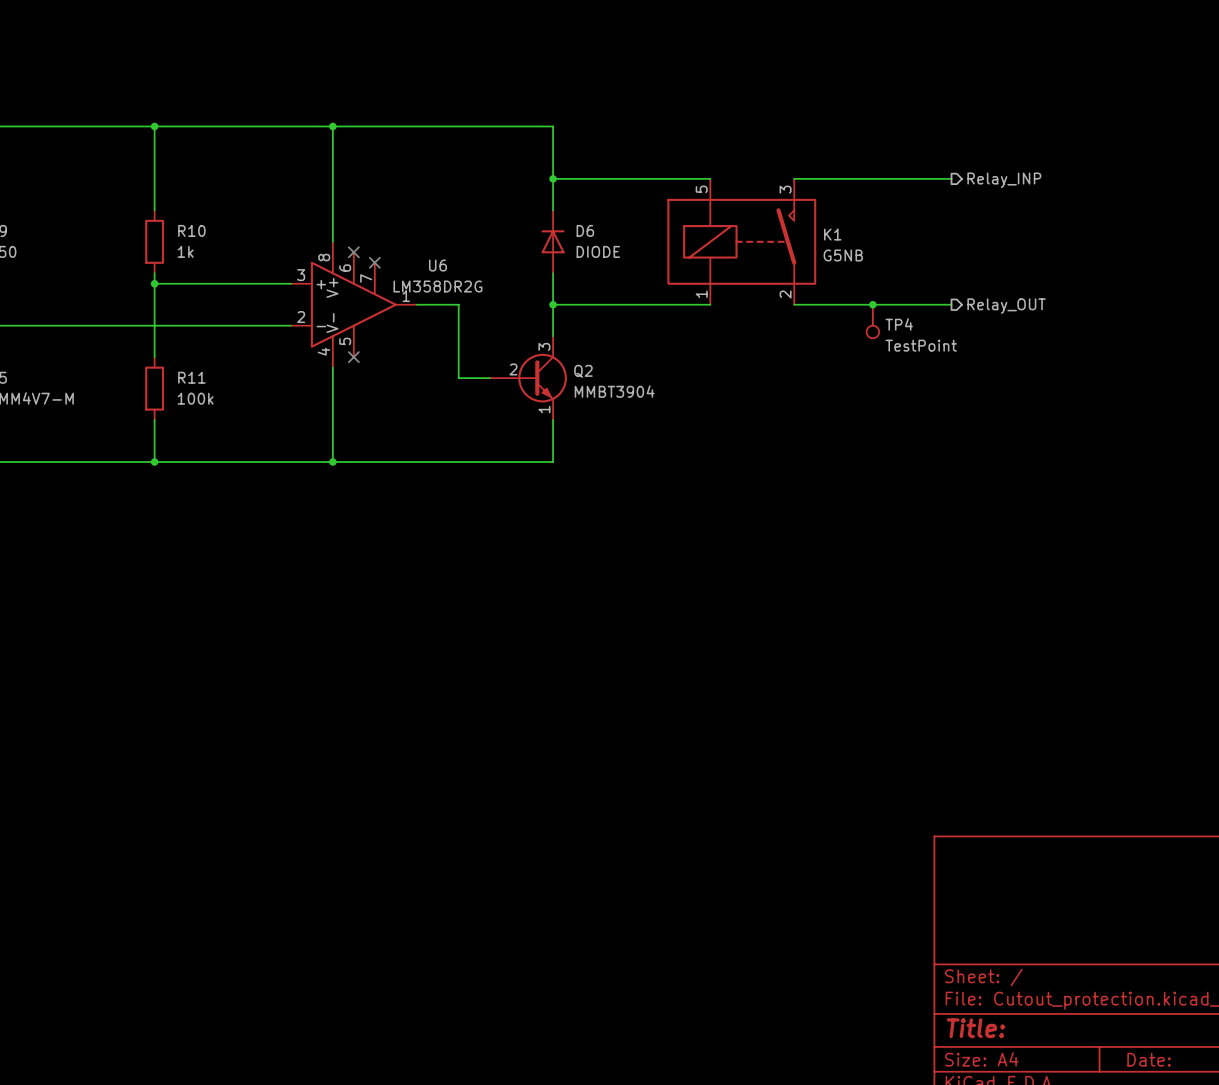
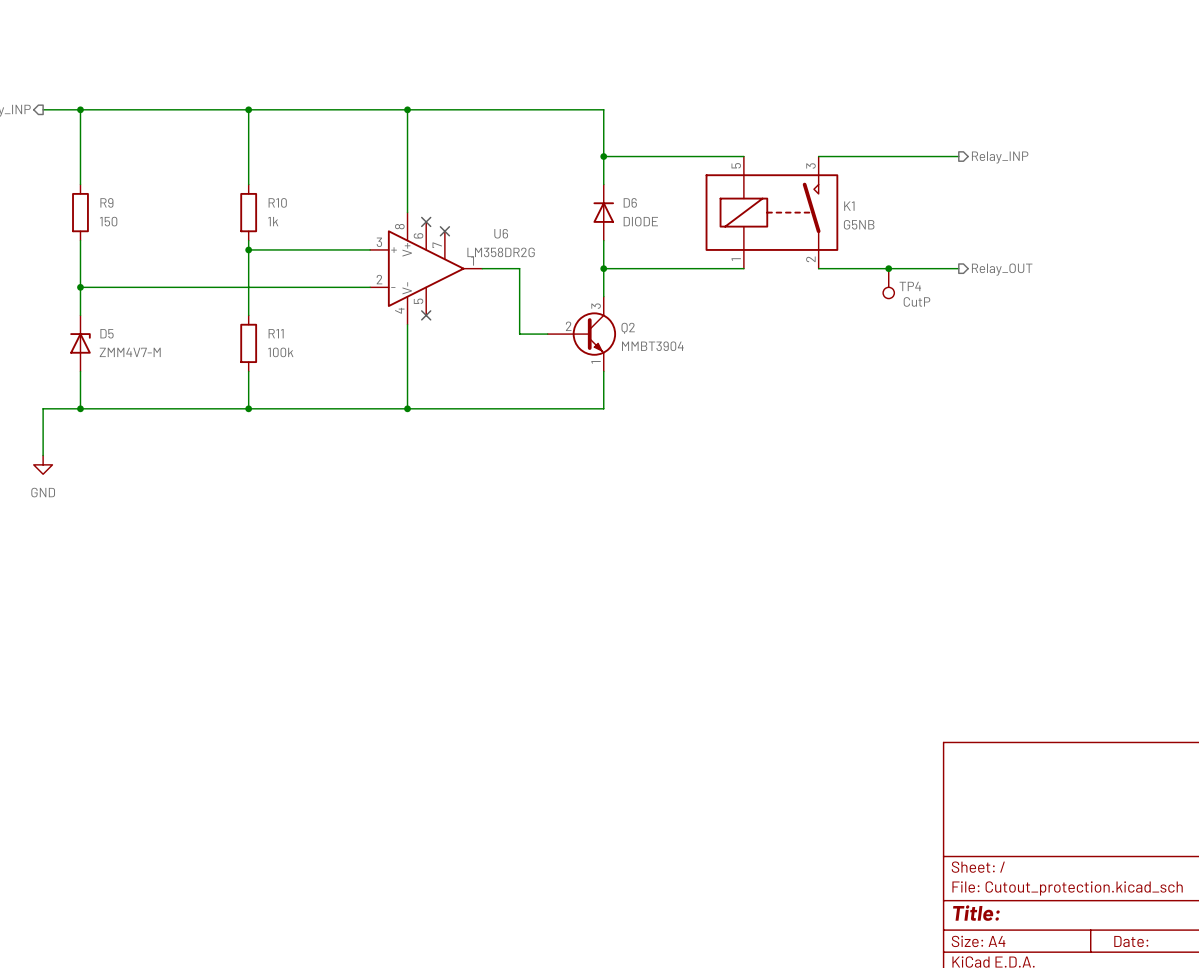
TP4 value: TestPoint (921, 345) -> CutP (916, 301)

